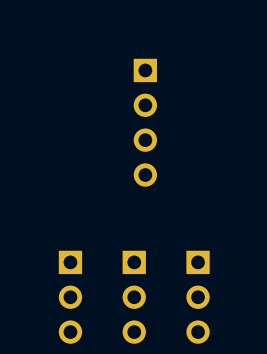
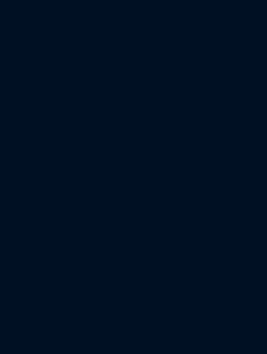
part: (145, 122) -> none
part: (70, 297) -> none
part: (134, 297) -> none
part: (198, 297) -> none

